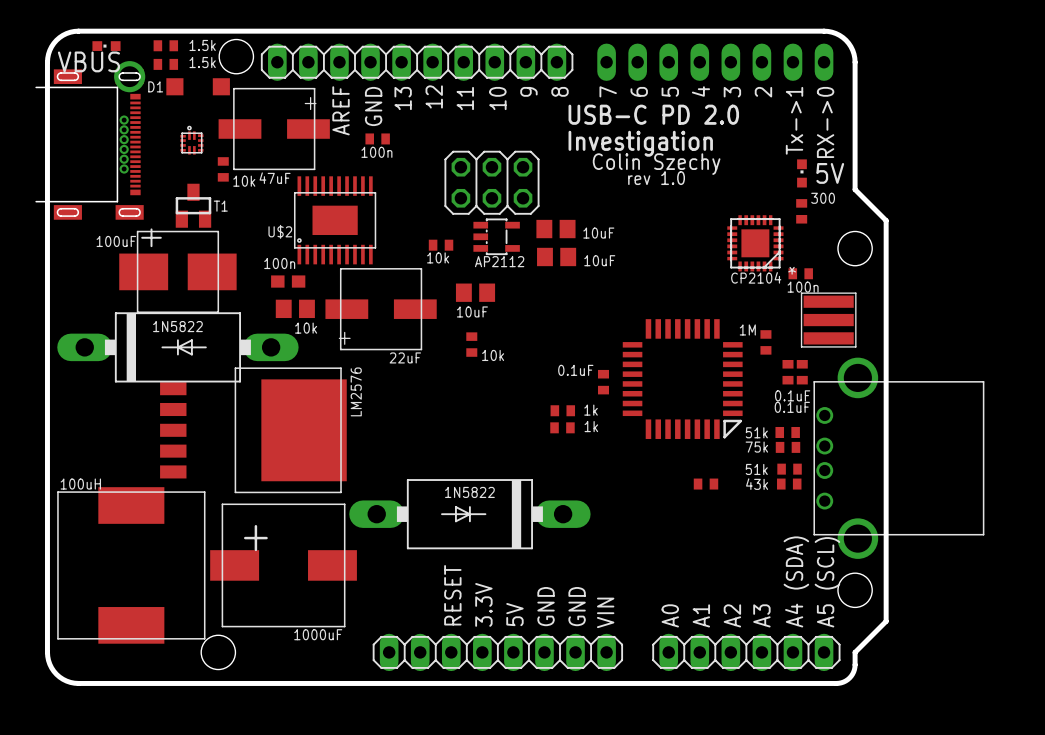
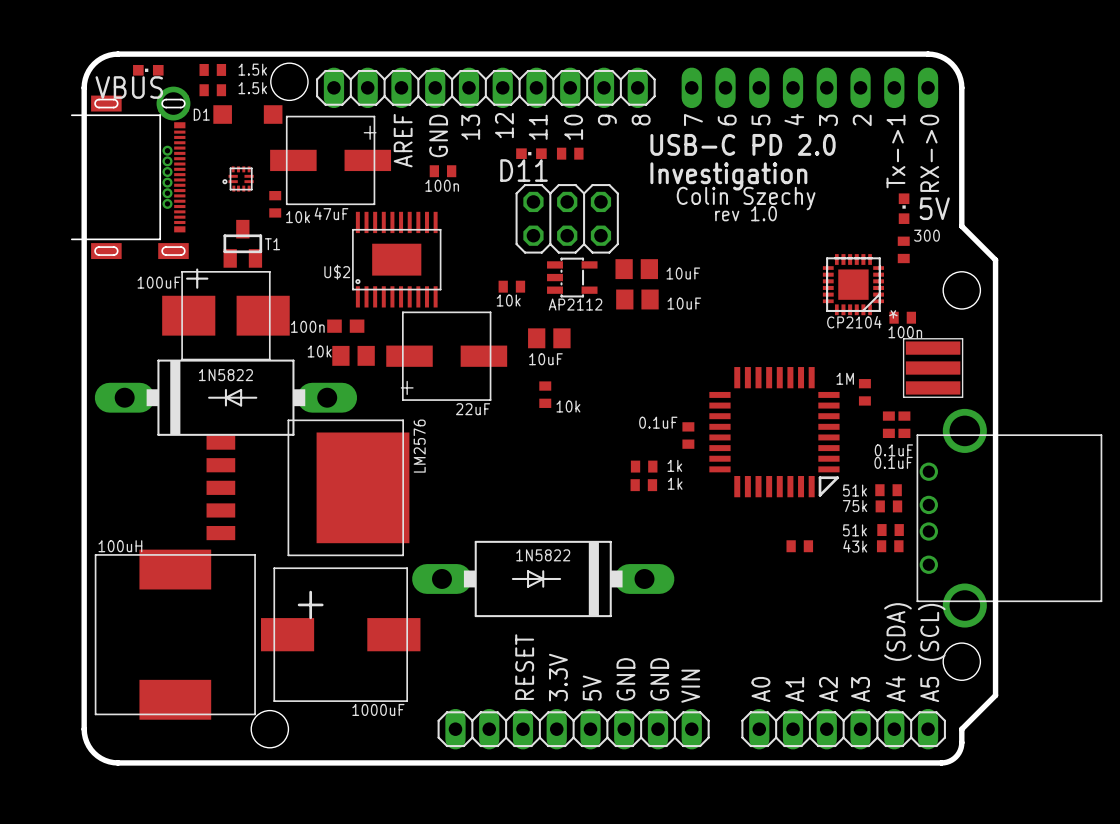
D11: none -> (531, 153)
part: none -> (570, 153)
part rotation: 0° (191, 140) -> 90° counterclockwise (238, 178)
part value position: 100n (279, 263) -> 100n (307, 326)
part value position: 10k (306, 328) -> 10k (319, 351)

